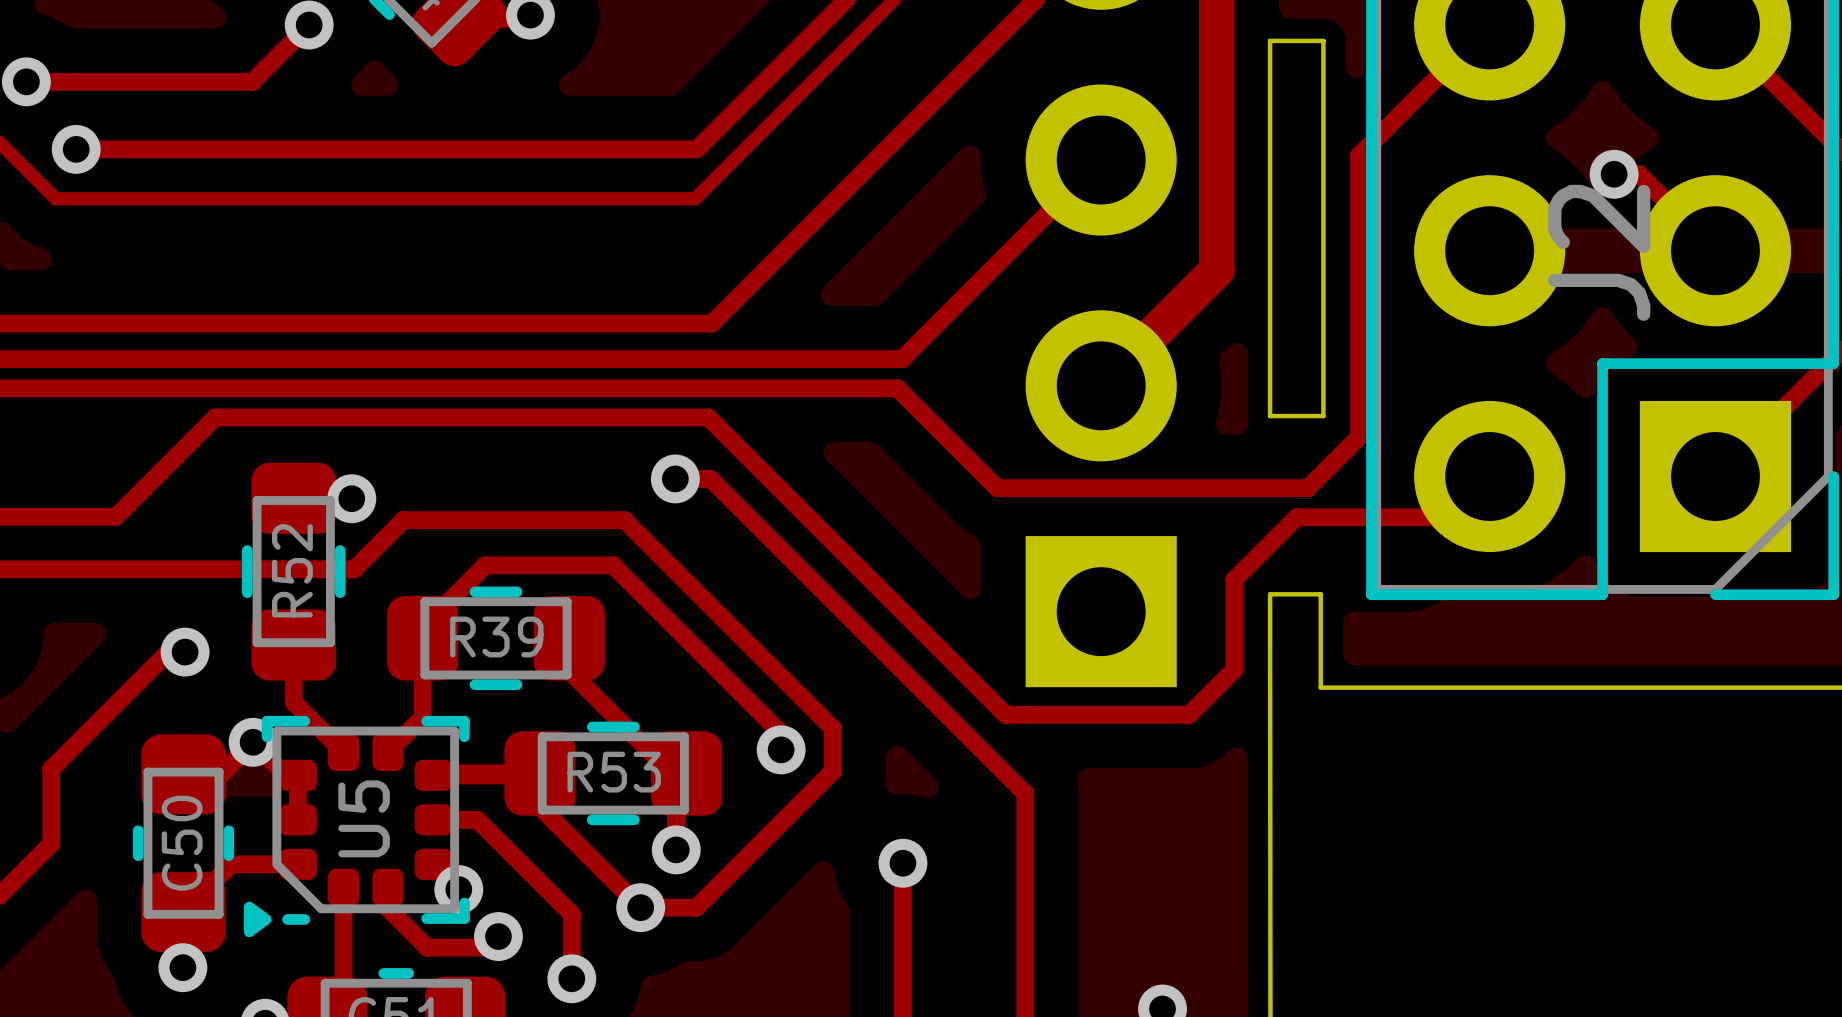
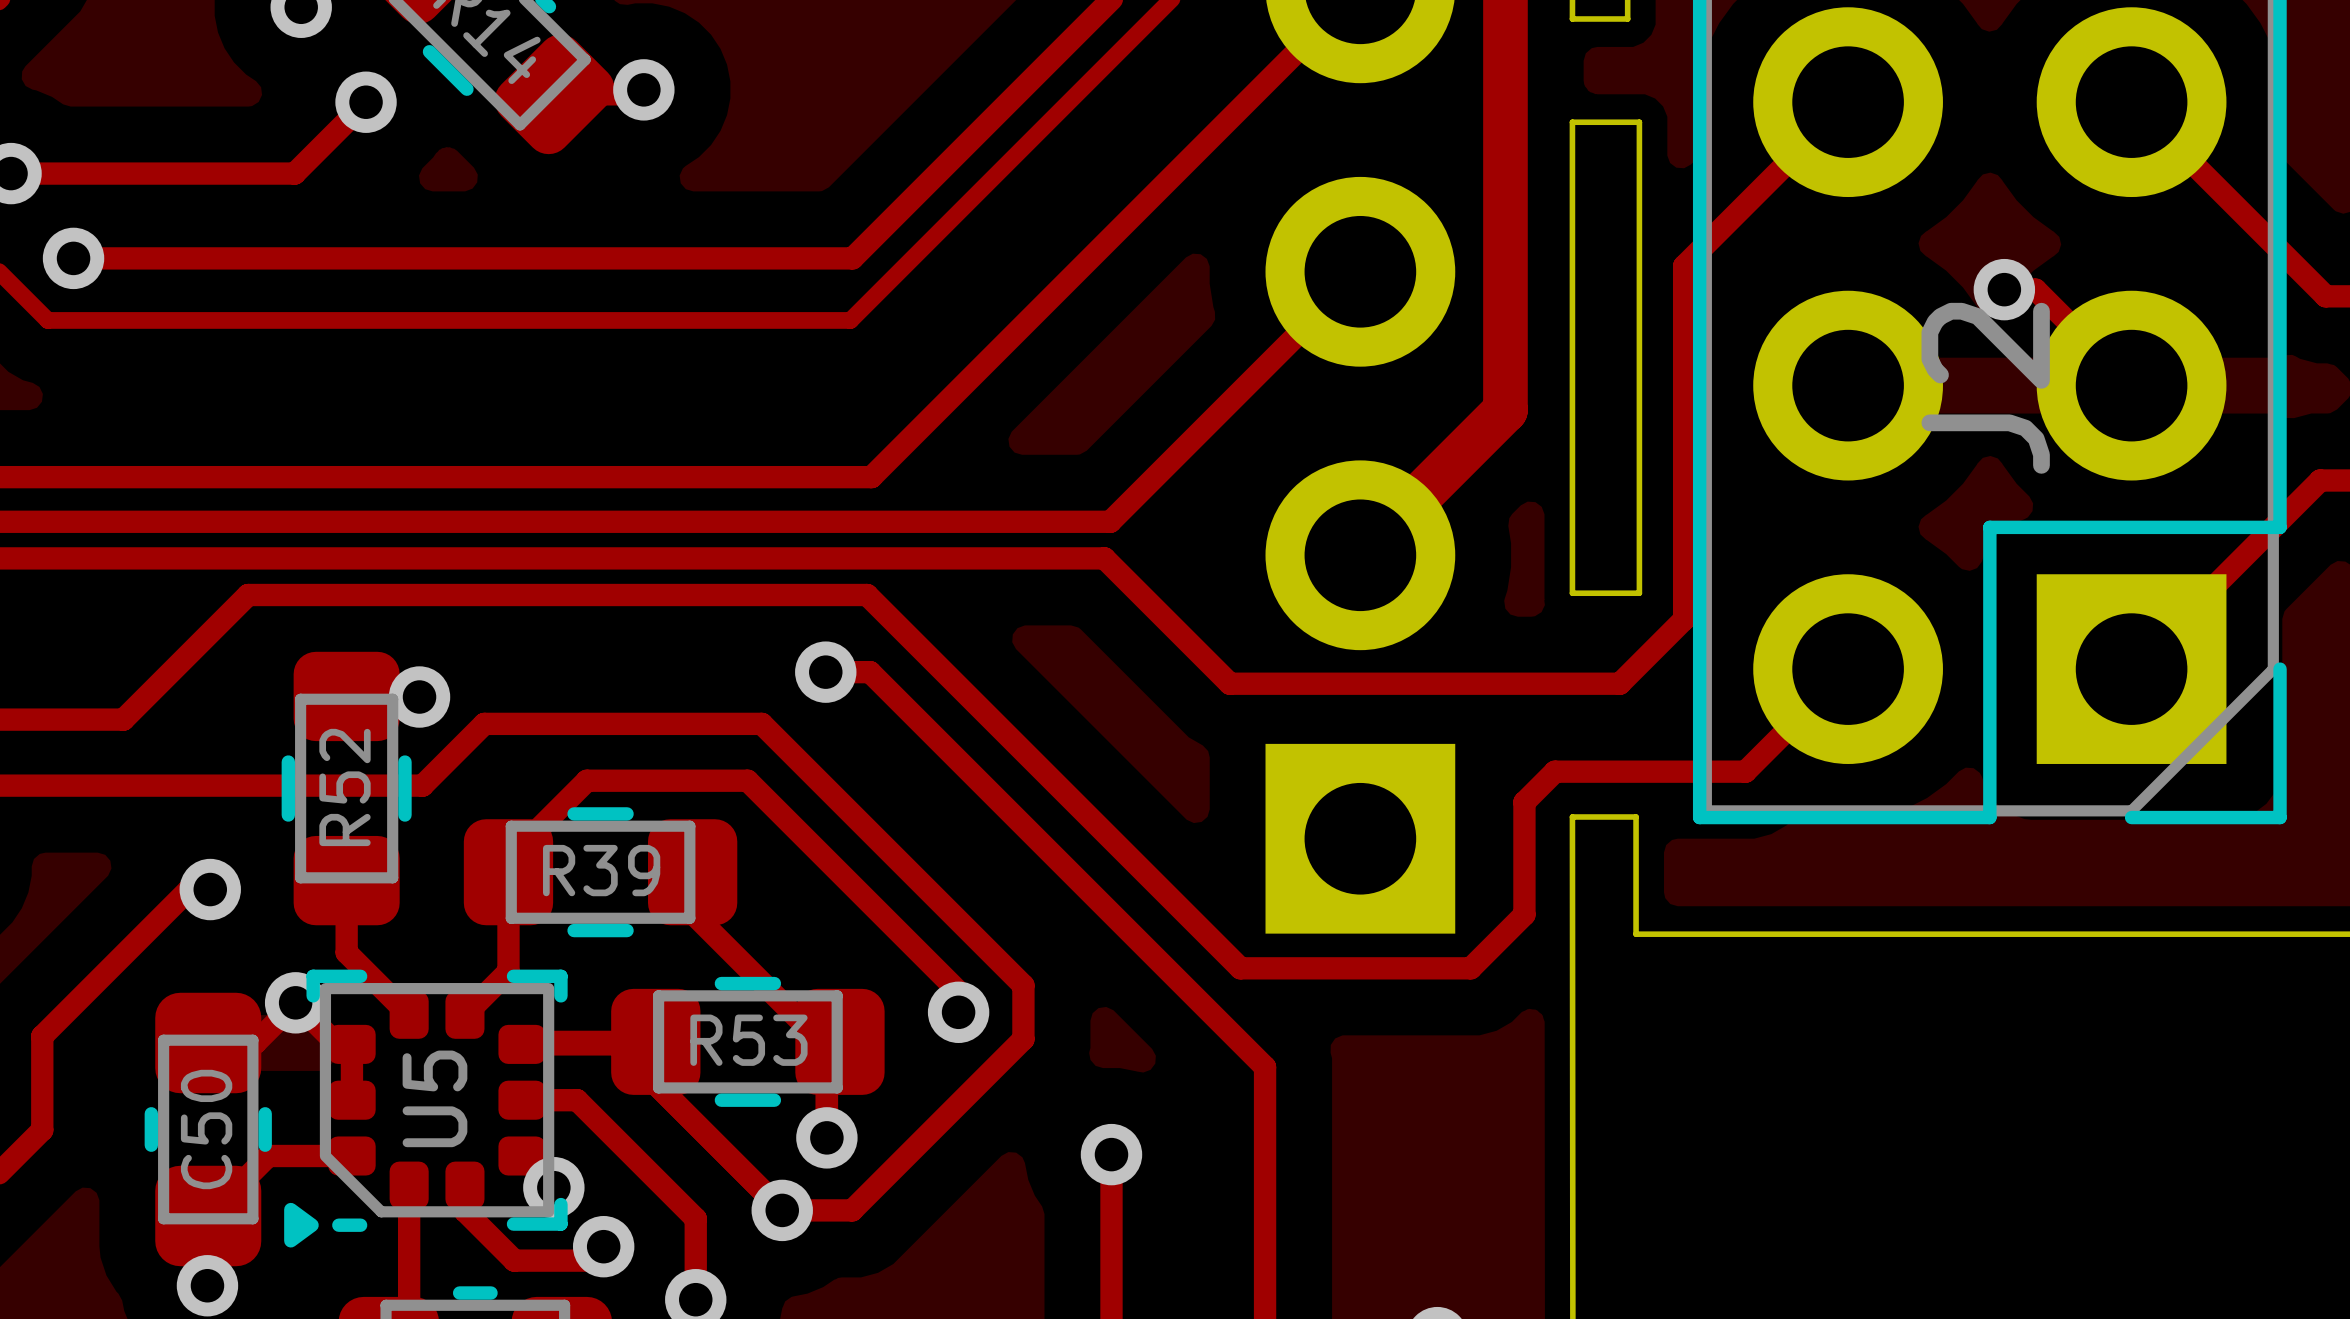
track: (1448, 517) (1296, 517) (1234, 579) (1234, 669) (1231, 672) -> (1796, 720) (1745, 771) (1555, 771) (1524, 802) (1524, 914)

